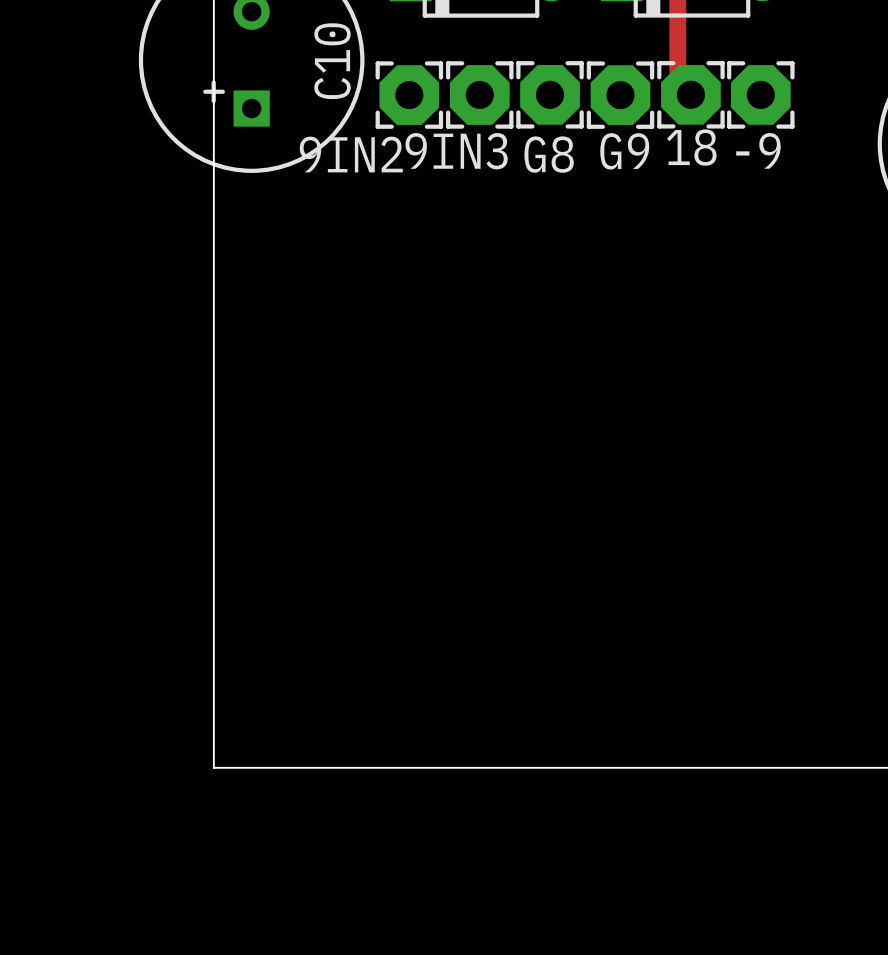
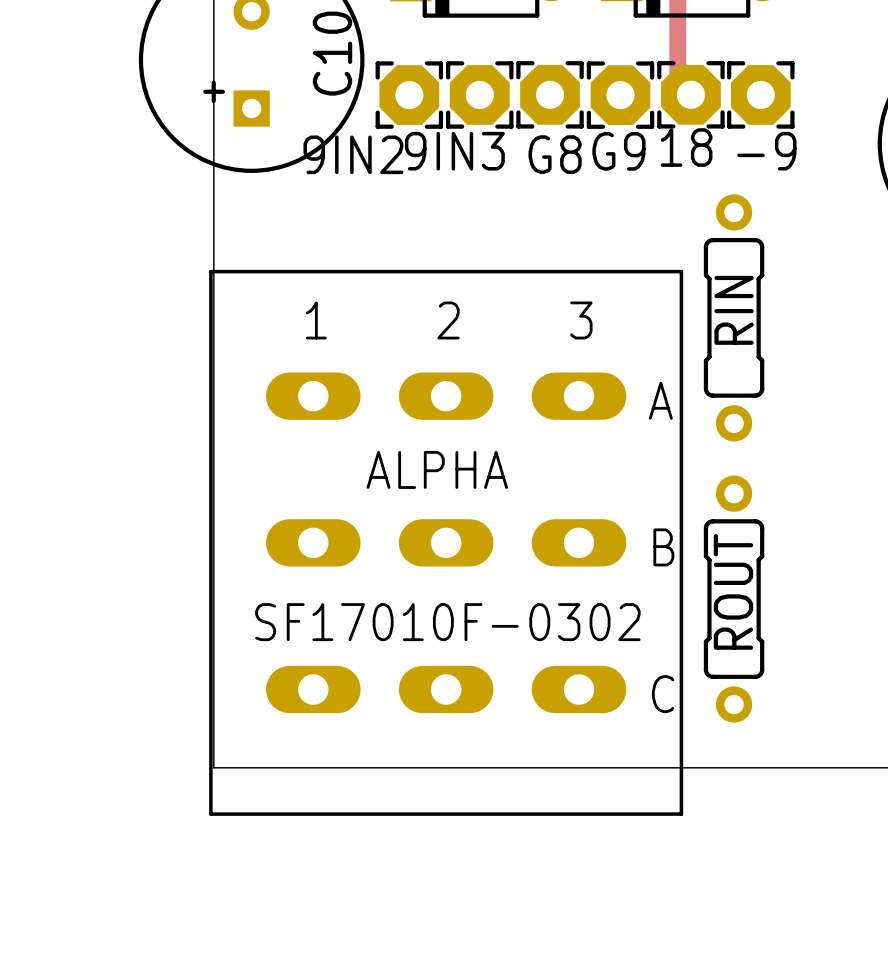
RIN: none -> (734, 317)
part: none -> (446, 542)
ROUT: none -> (734, 599)

